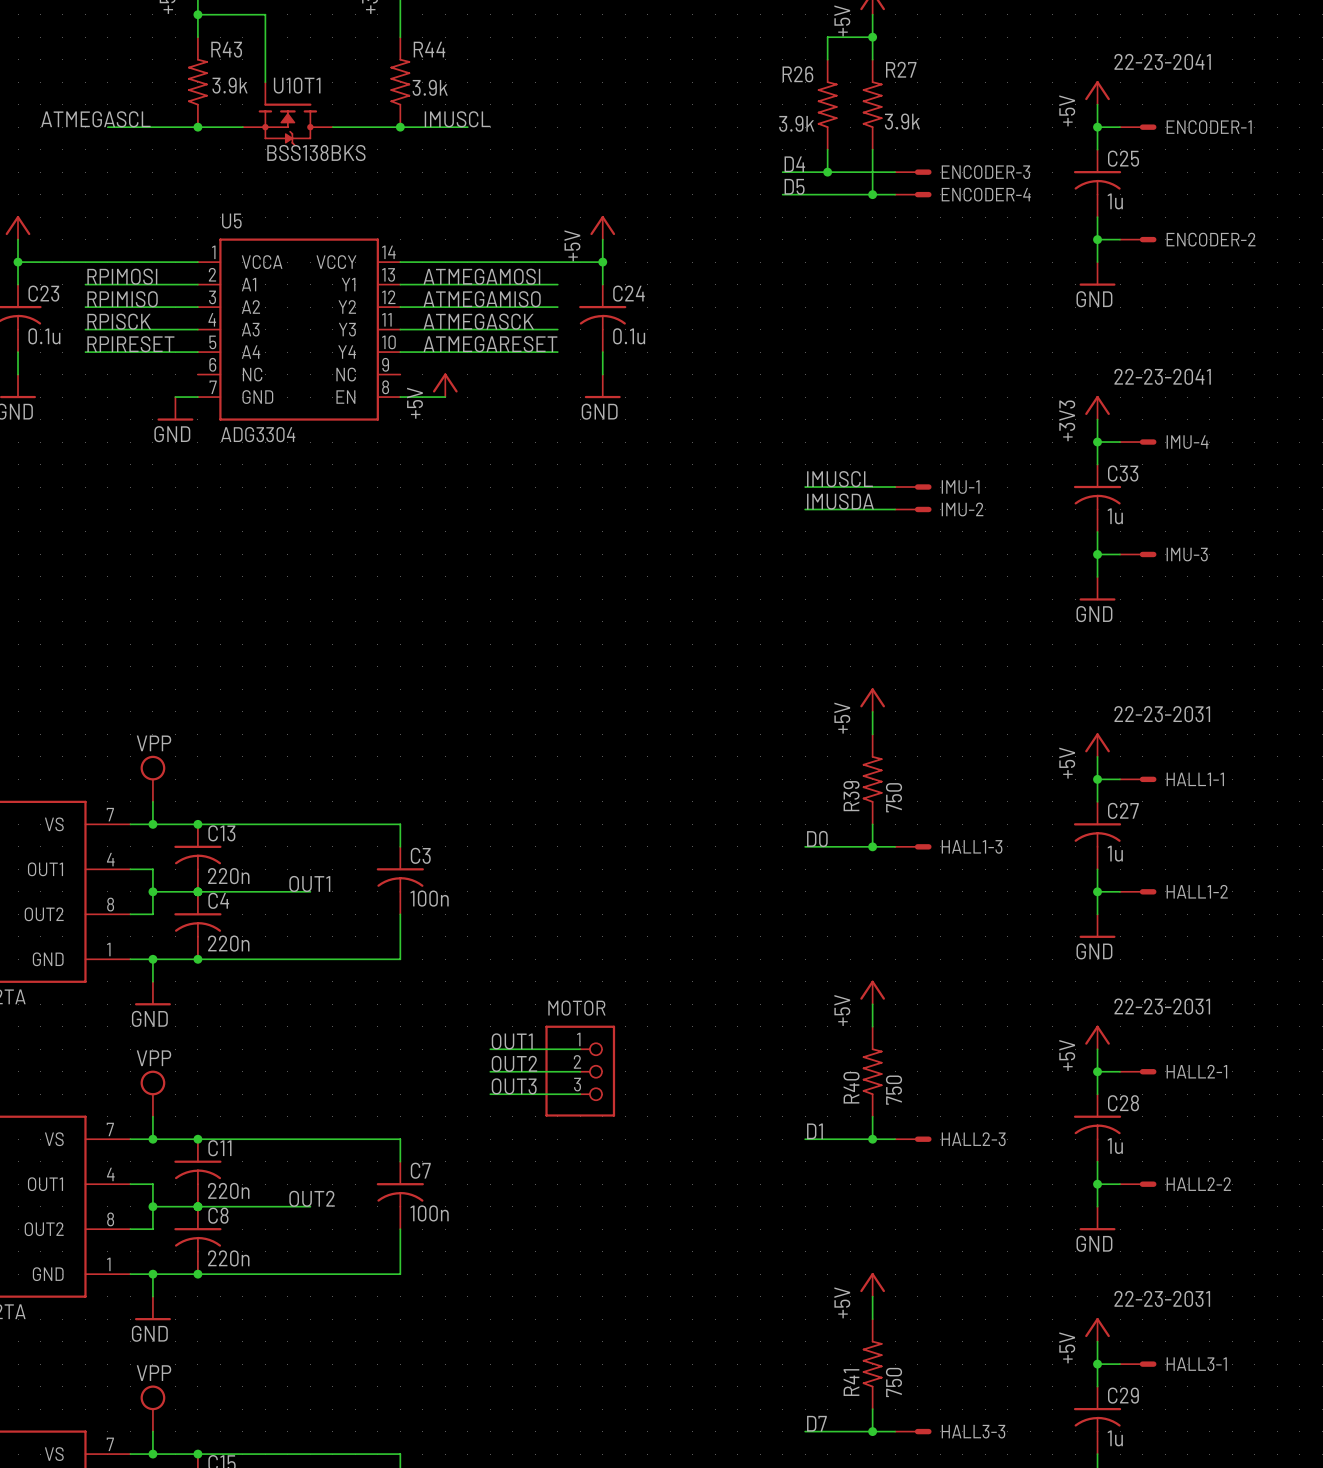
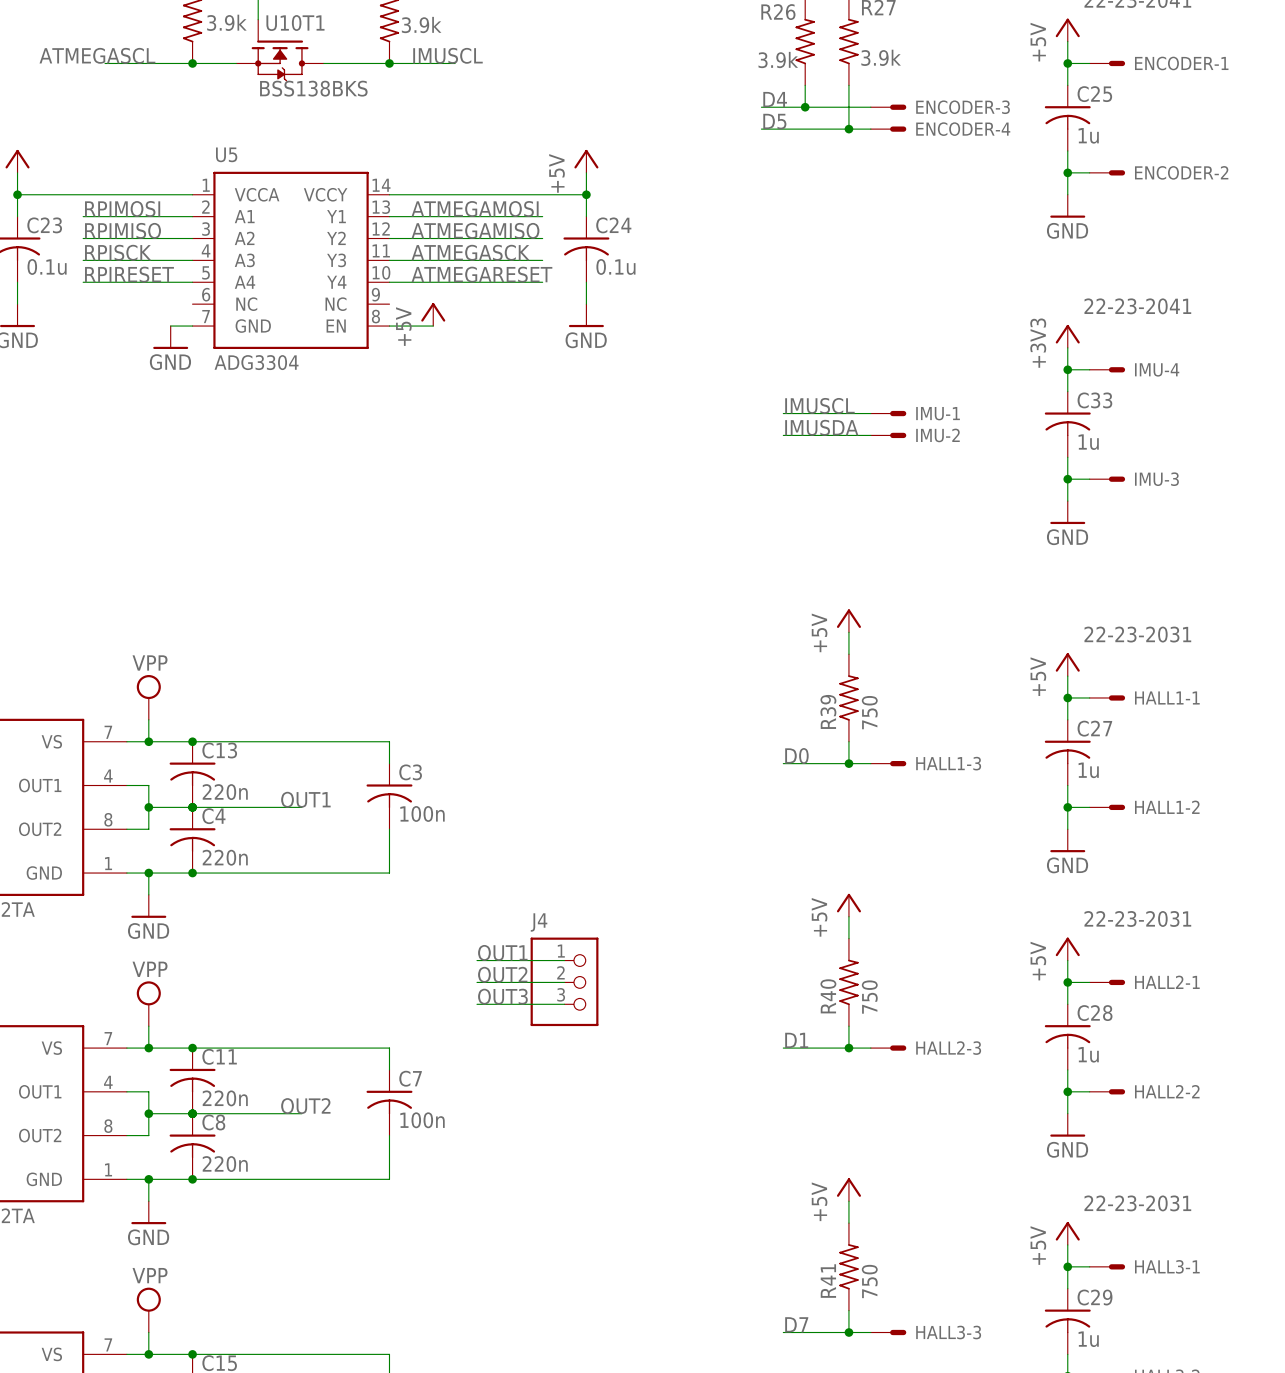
MOTOR name: MOTOR (576, 1008) -> J4 (539, 922)

